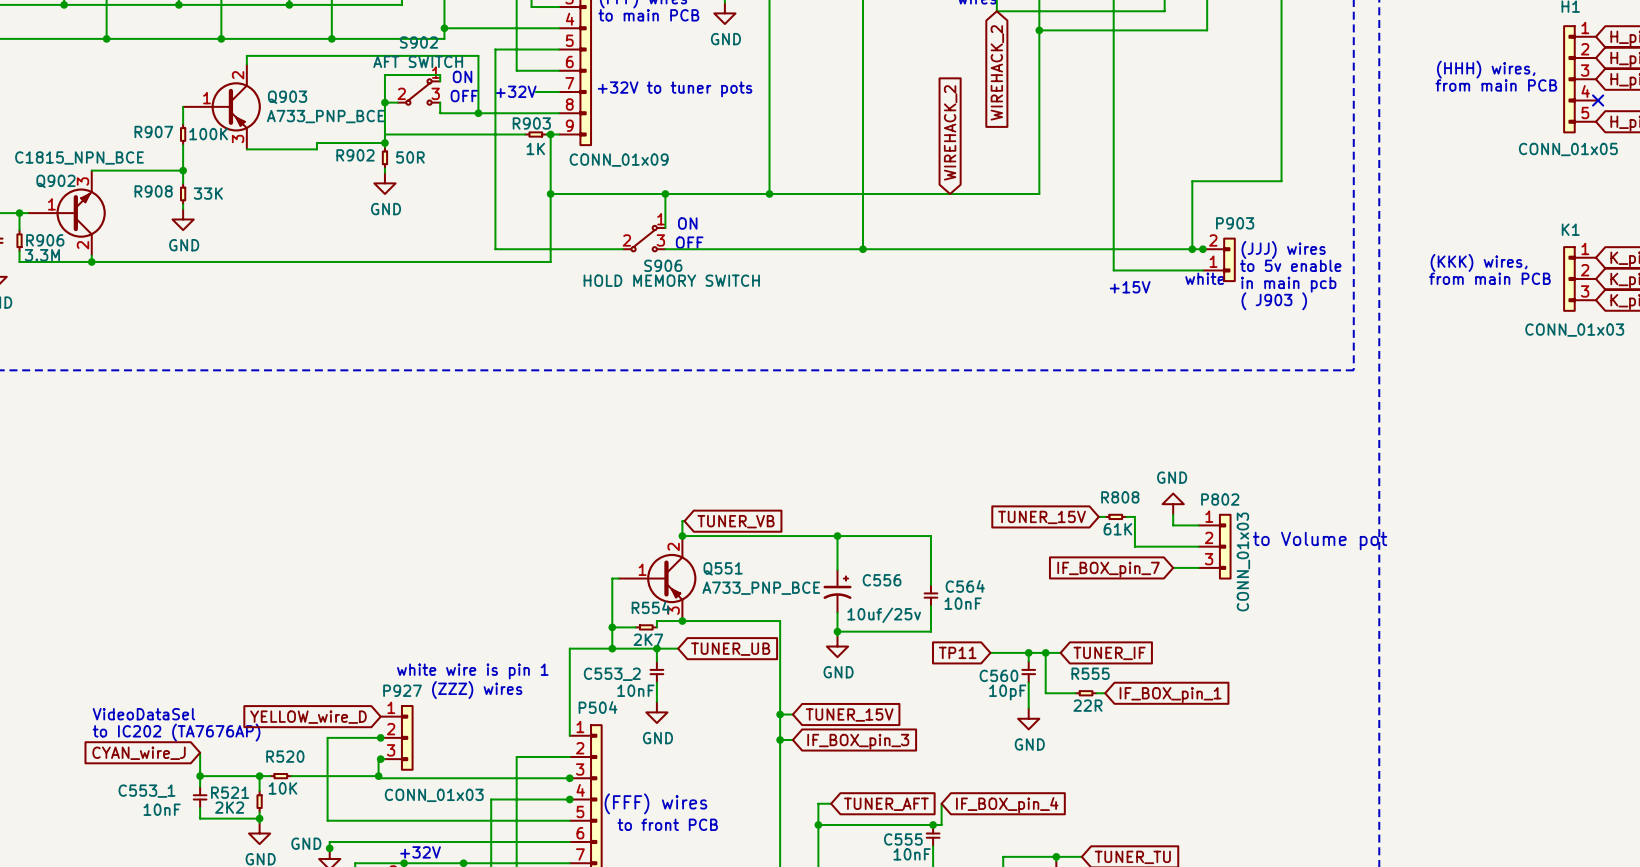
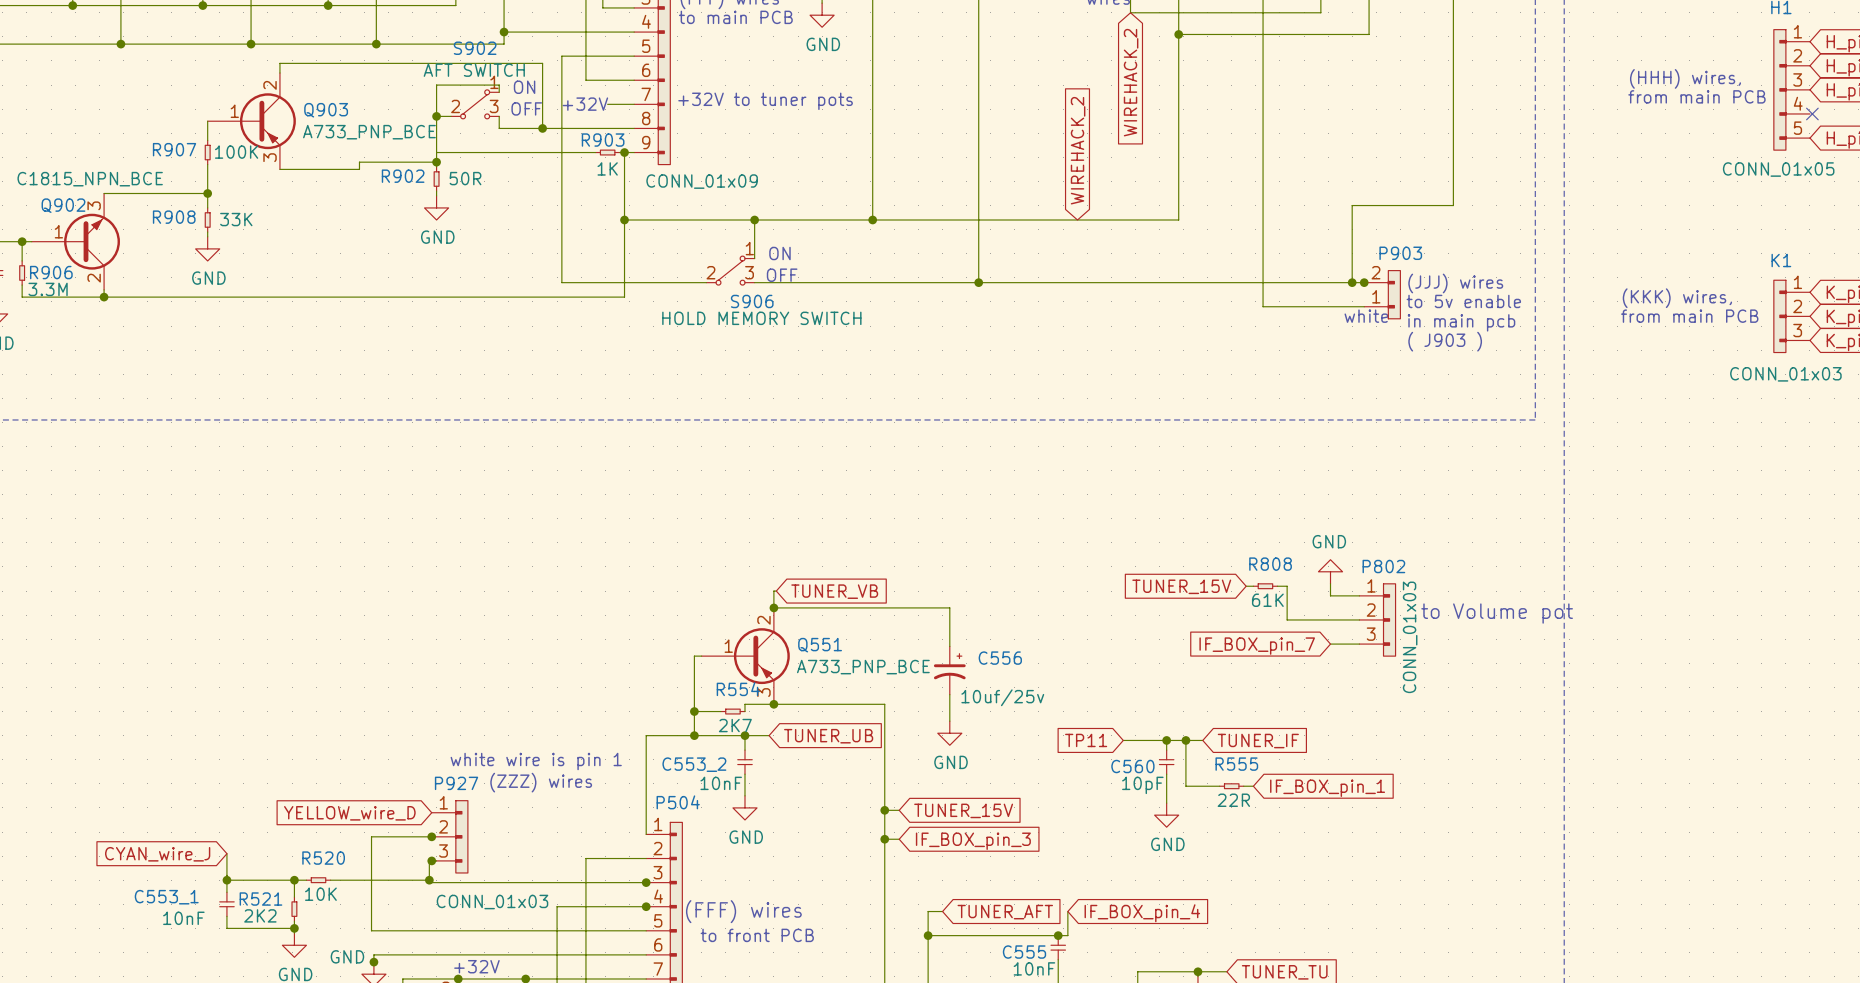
text: +15V (1130, 287) -> none
wire: (837, 536) (930, 536) (930, 584) -> none
junction: (837, 536) -> none
C564: 10nF (930, 595) -> none
wire: (930, 606) (930, 631) (837, 631) -> none
junction: (837, 631) -> none
text: VideoDataSel (143, 714) -> none
text: to IC202 (TA7676AP) (176, 732) -> none

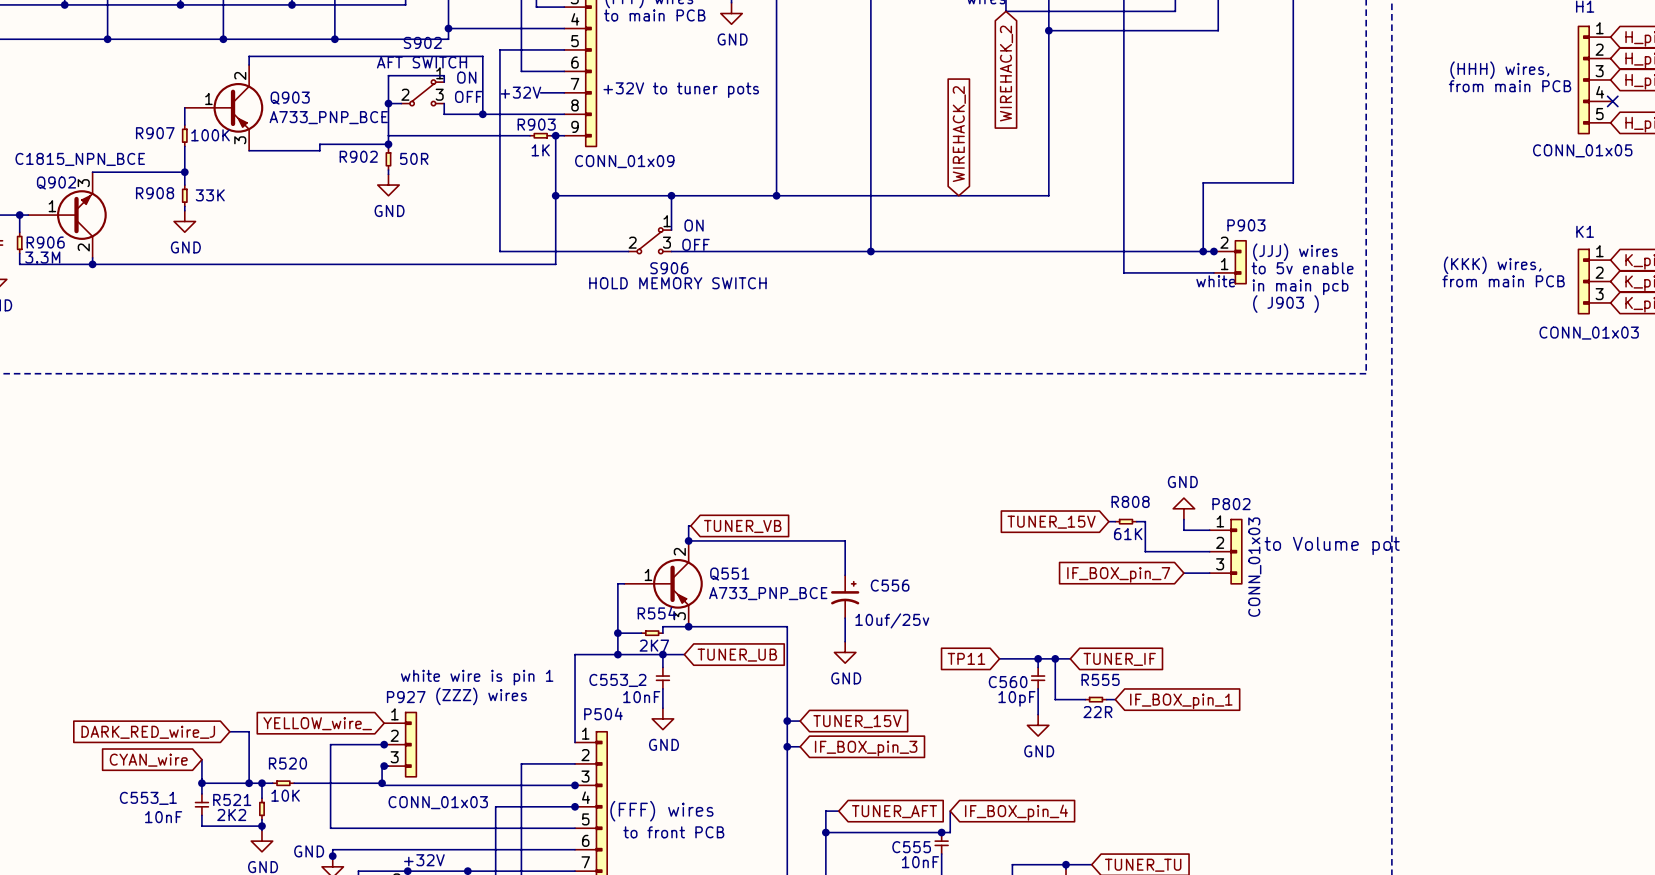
global label: YELLOW_wire_D (349, 813) -> YELLOW_wire_ (317, 723)
global label: none -> DARK_RED_wire_J (148, 732)
wire: none -> (229, 731) (249, 731) (249, 783)
global label: CYAN_wire_J (157, 854) -> CYAN_wire (148, 760)
junction: none -> (249, 783)

